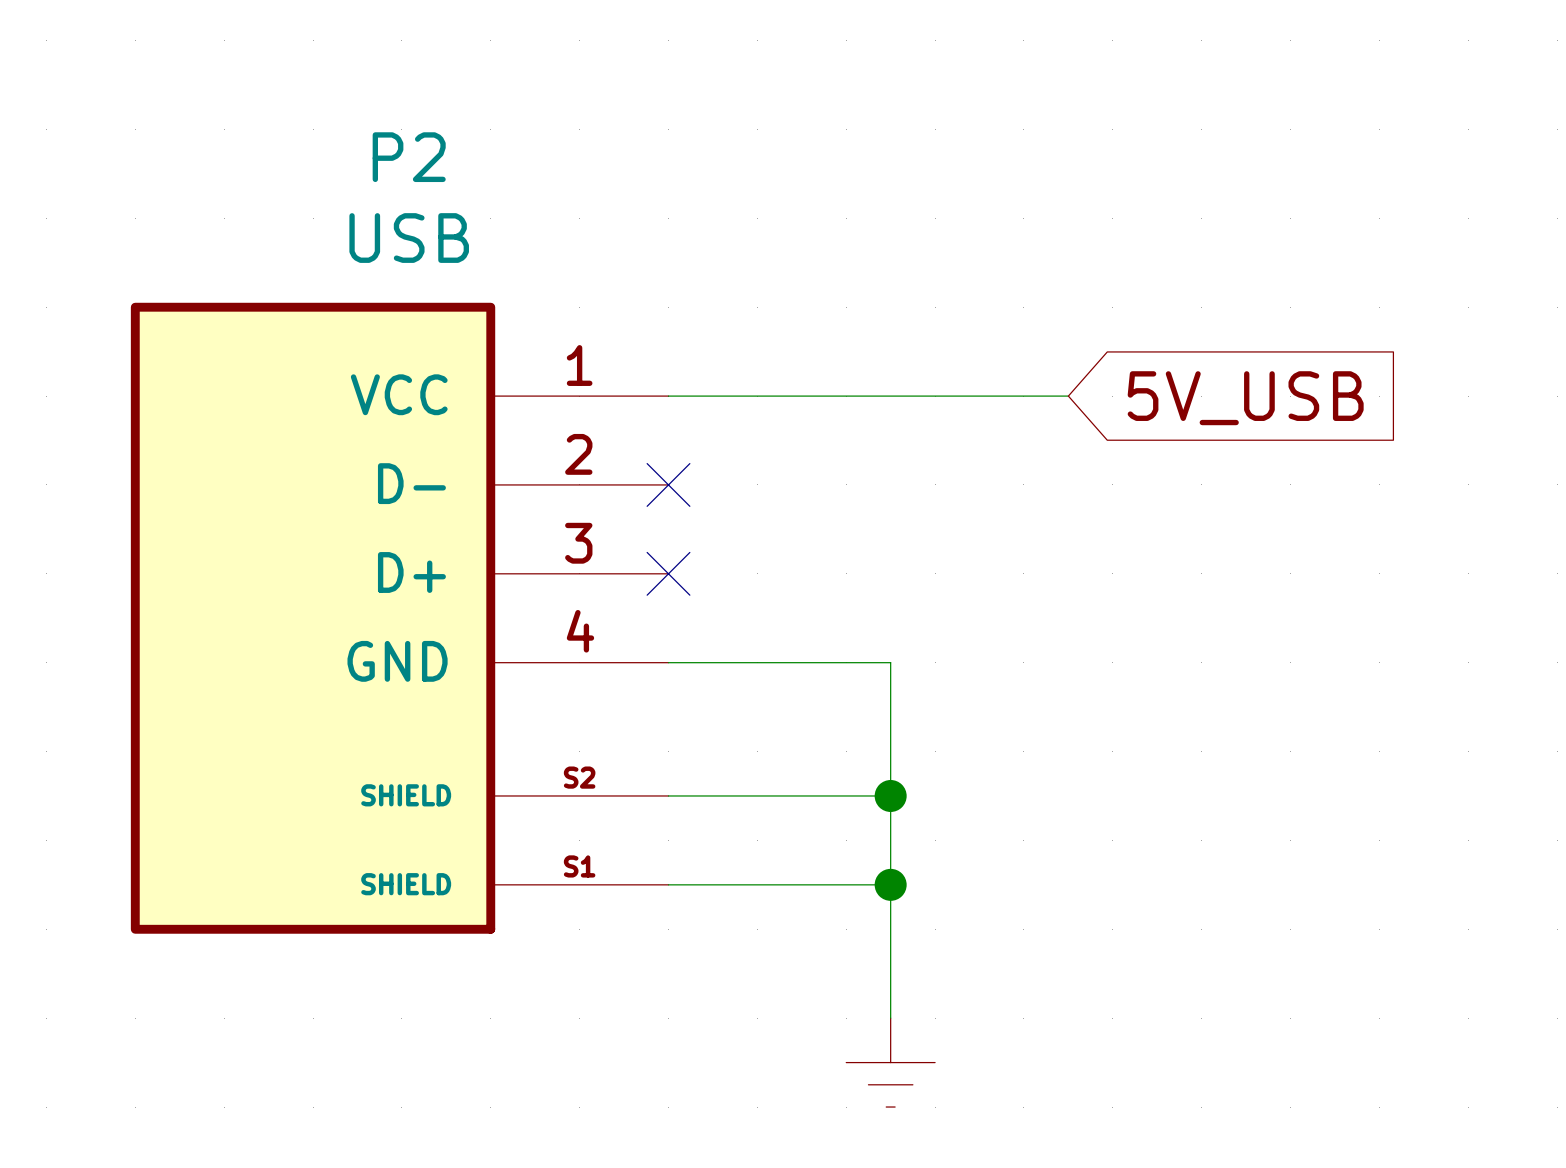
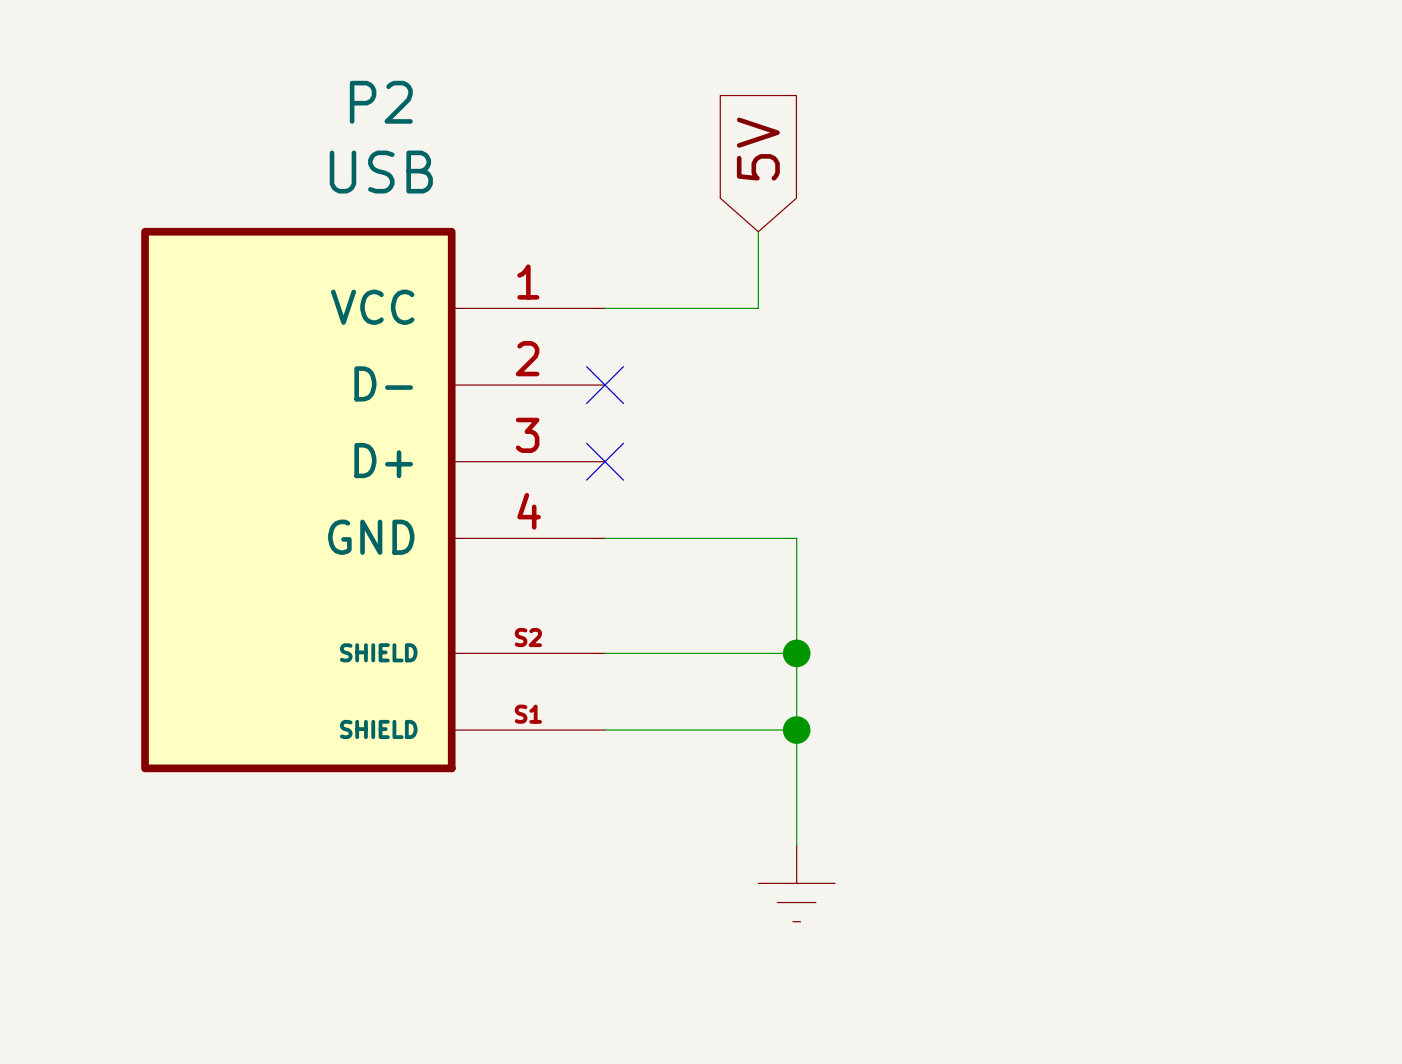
global label: none -> 5V (758, 149)
wire: (846, 396) (1068, 396) -> (758, 308) (758, 231)
global label: 5V_USB (1245, 398) -> none

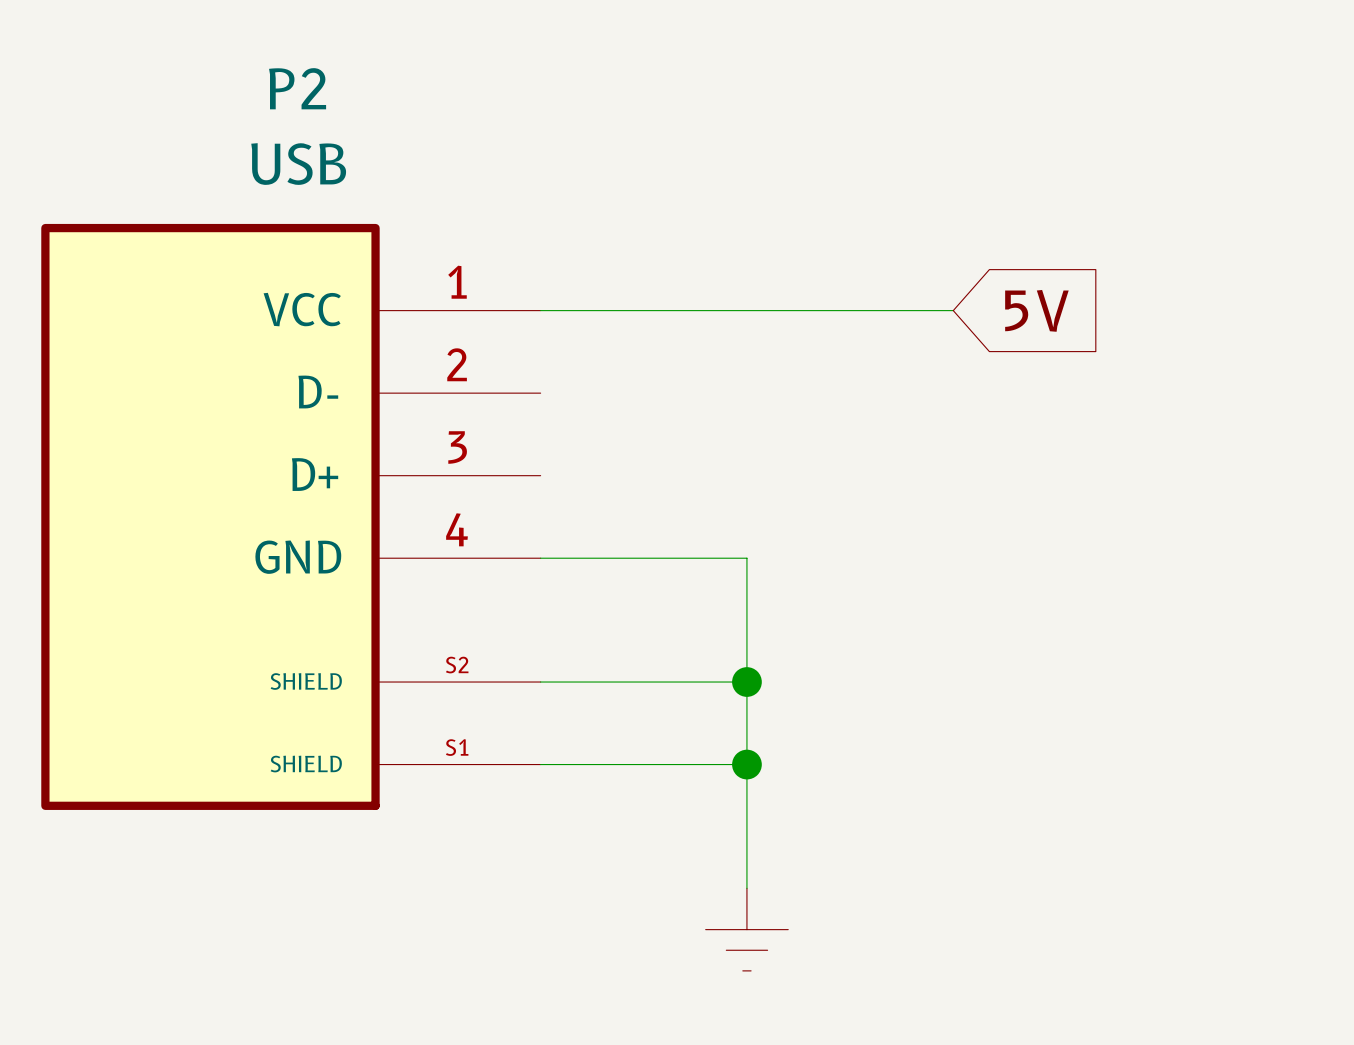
global label rotation: 0° (758, 149) -> 90° clockwise (1036, 310)
global label position: 5V (758, 149) -> 5V (1036, 310)
wire: (758, 231) (758, 308) -> (953, 310) (705, 310)
no-connect mark: (605, 385) -> none
no-connect mark: (605, 461) -> none

